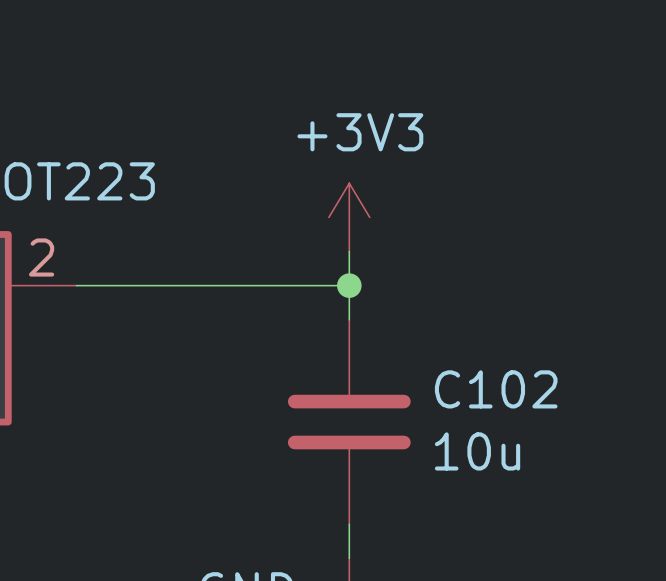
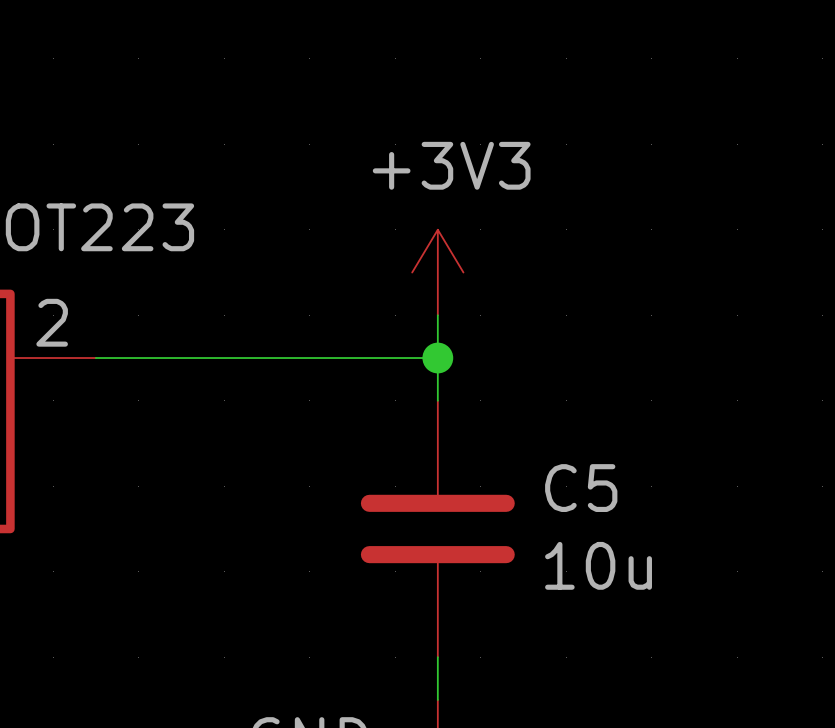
C102 name: C102 (496, 389) -> C5 (581, 488)

